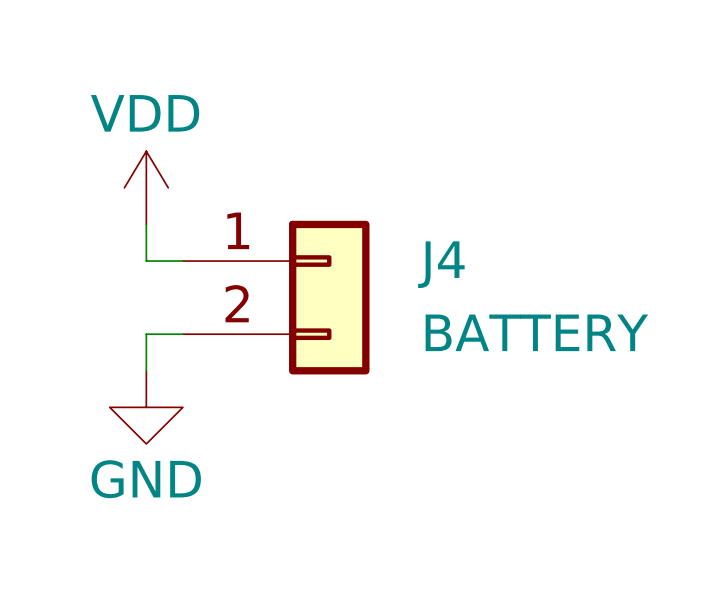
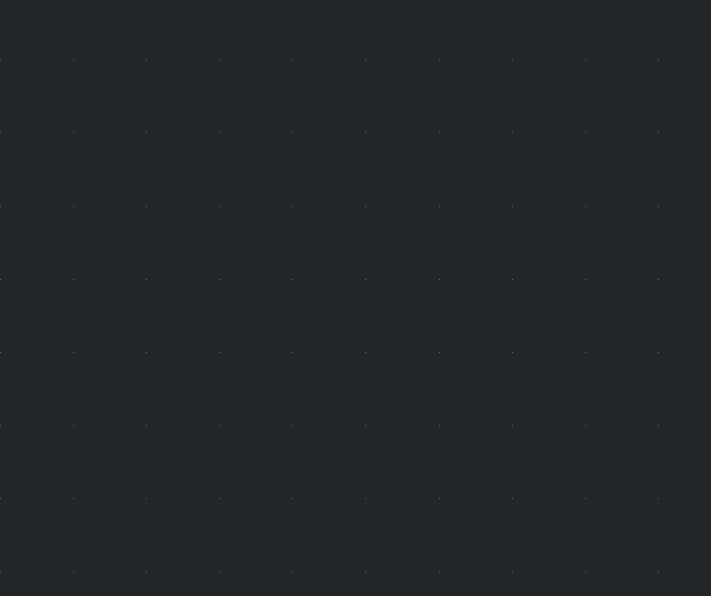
power symbol: VDD (146, 187) -> none
wire: (146, 224) (146, 261) (182, 261) -> none
J4: BATTERY (276, 297) -> none
wire: (182, 334) (146, 334) (146, 370) -> none
power symbol: GND (146, 407) -> none

